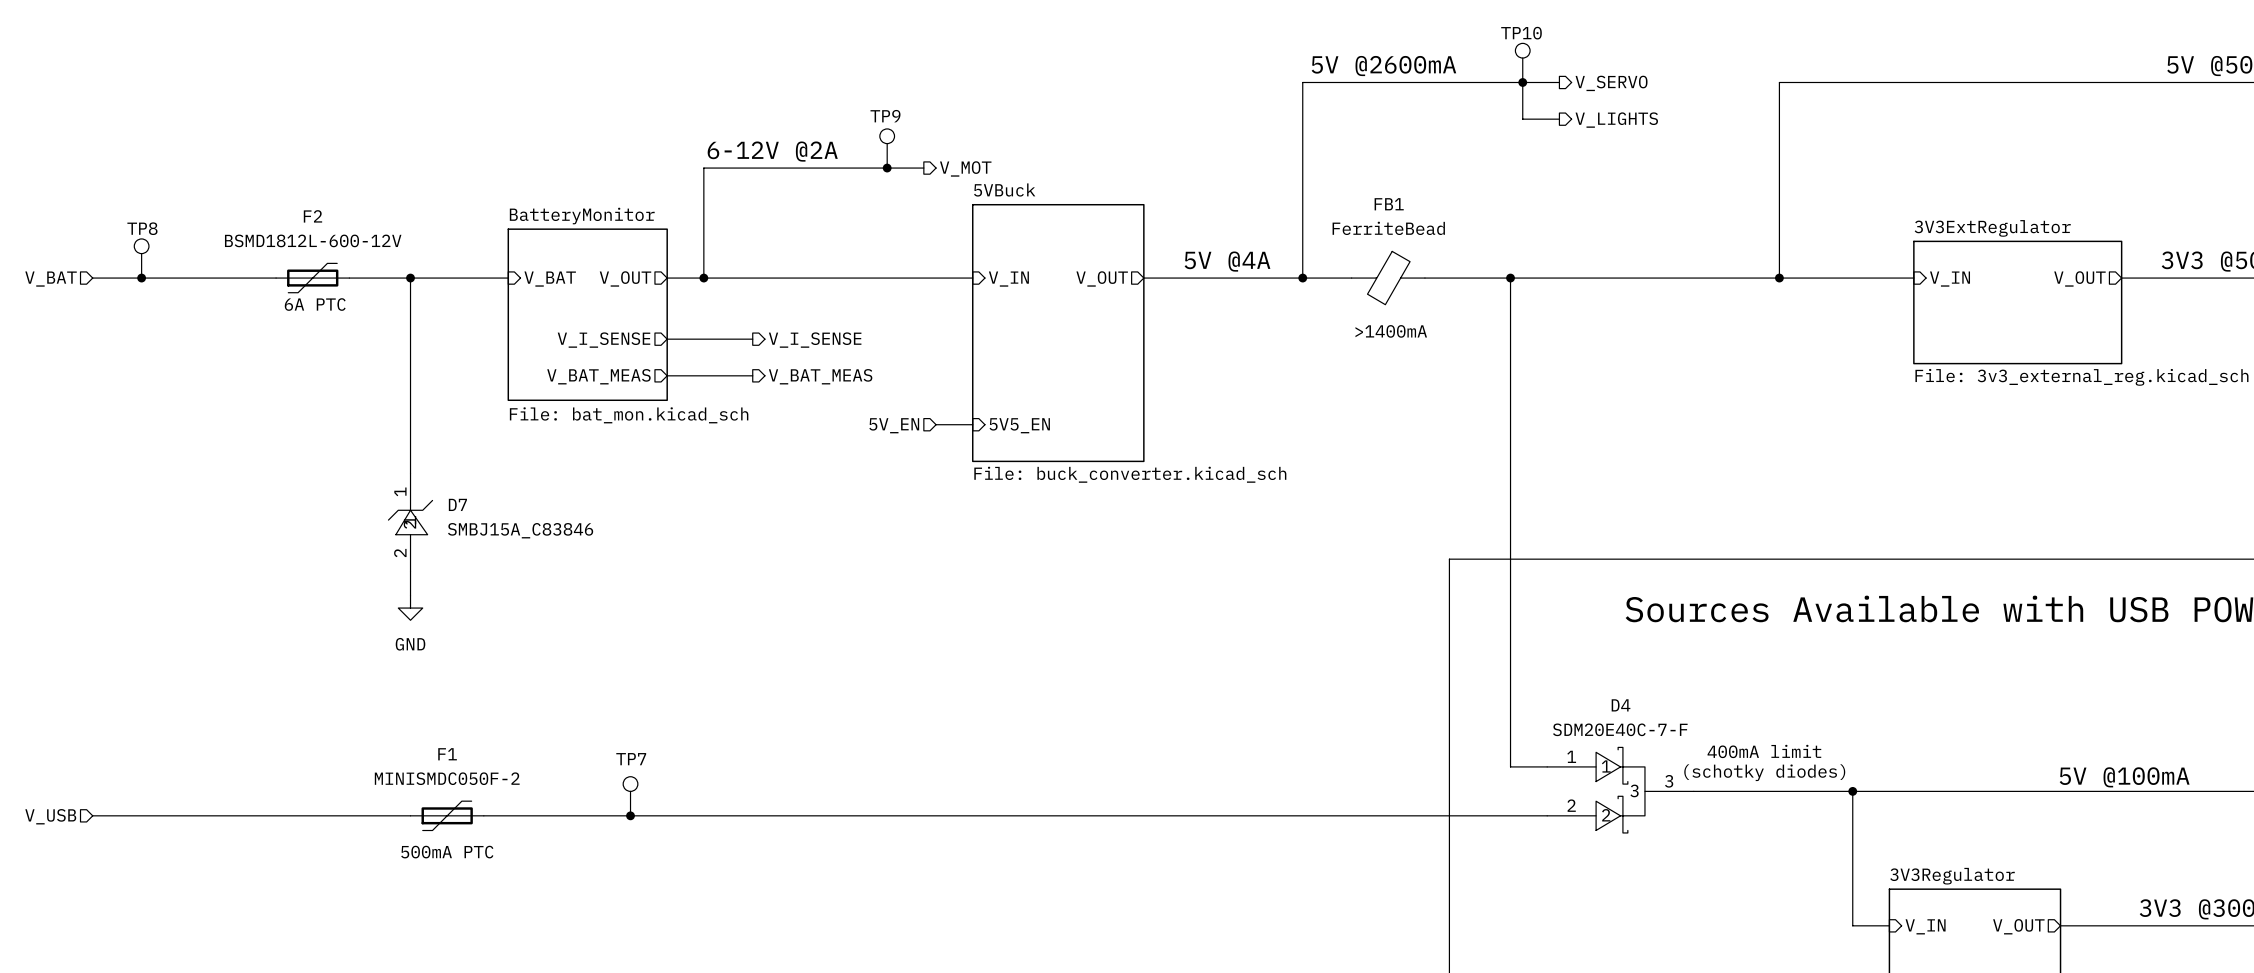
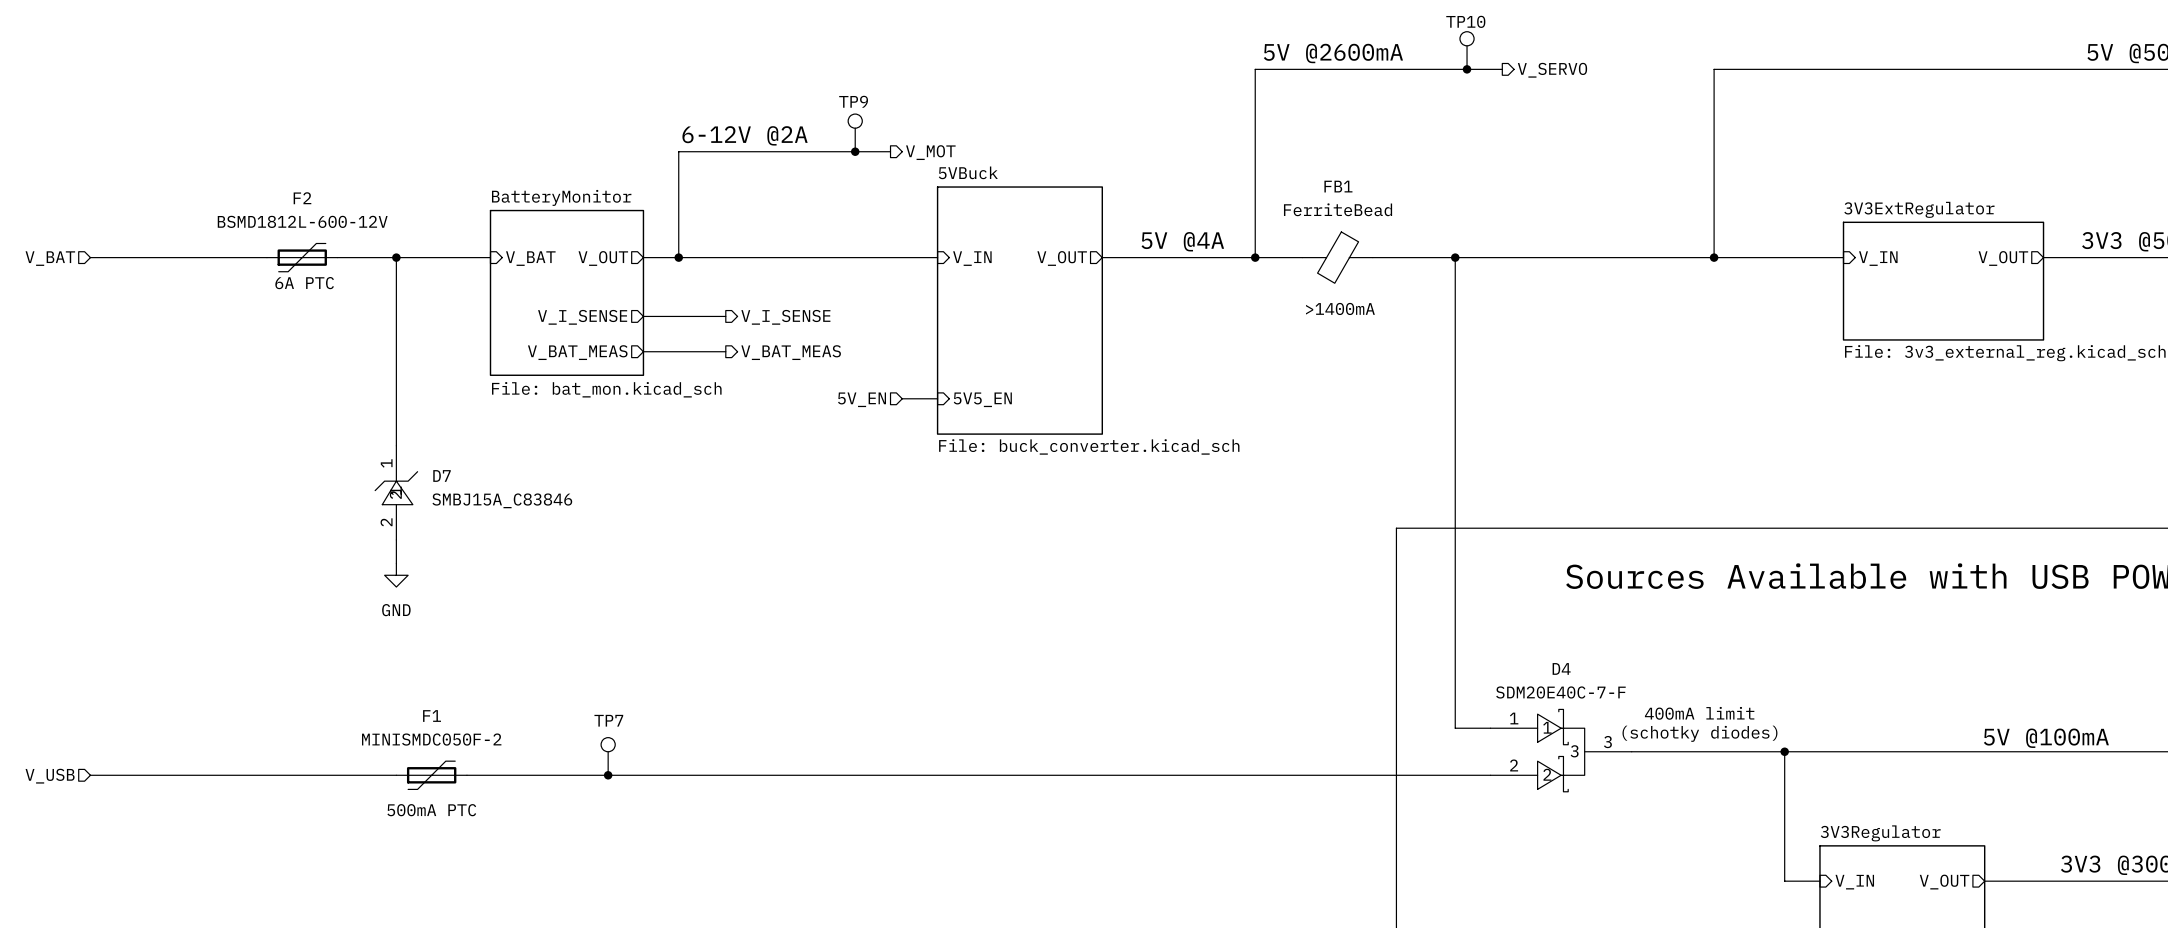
wire: (1522, 82) (1522, 119) (1559, 119) -> none
hierarchical label: V_LIGHTS (1616, 120) -> none
TP8: (141, 258) -> none
junction: (141, 278) -> none

